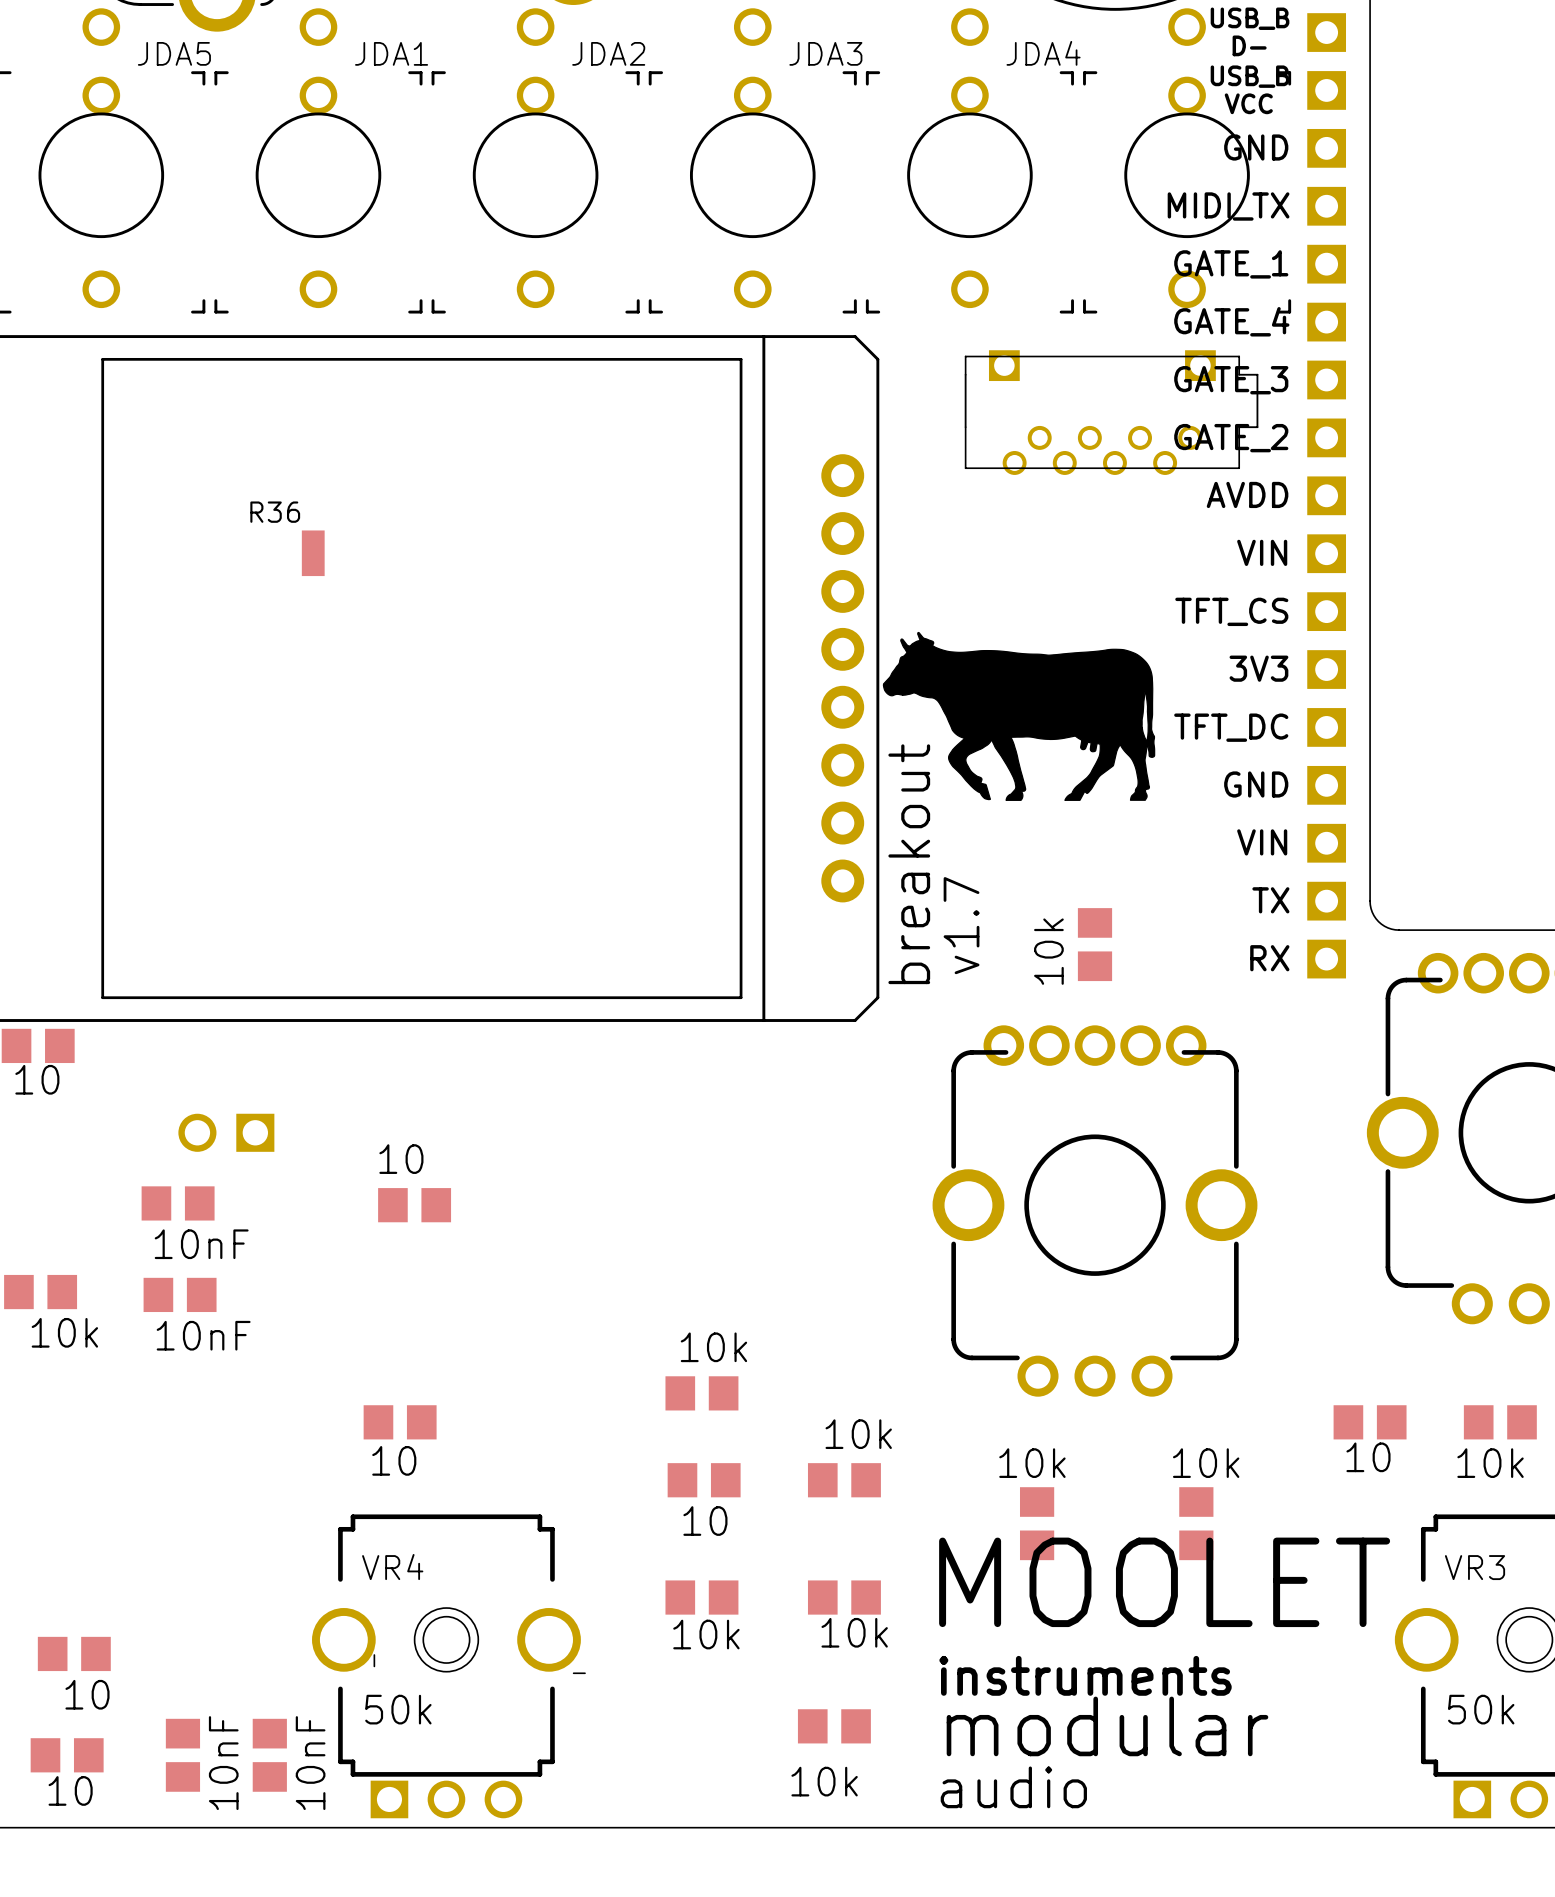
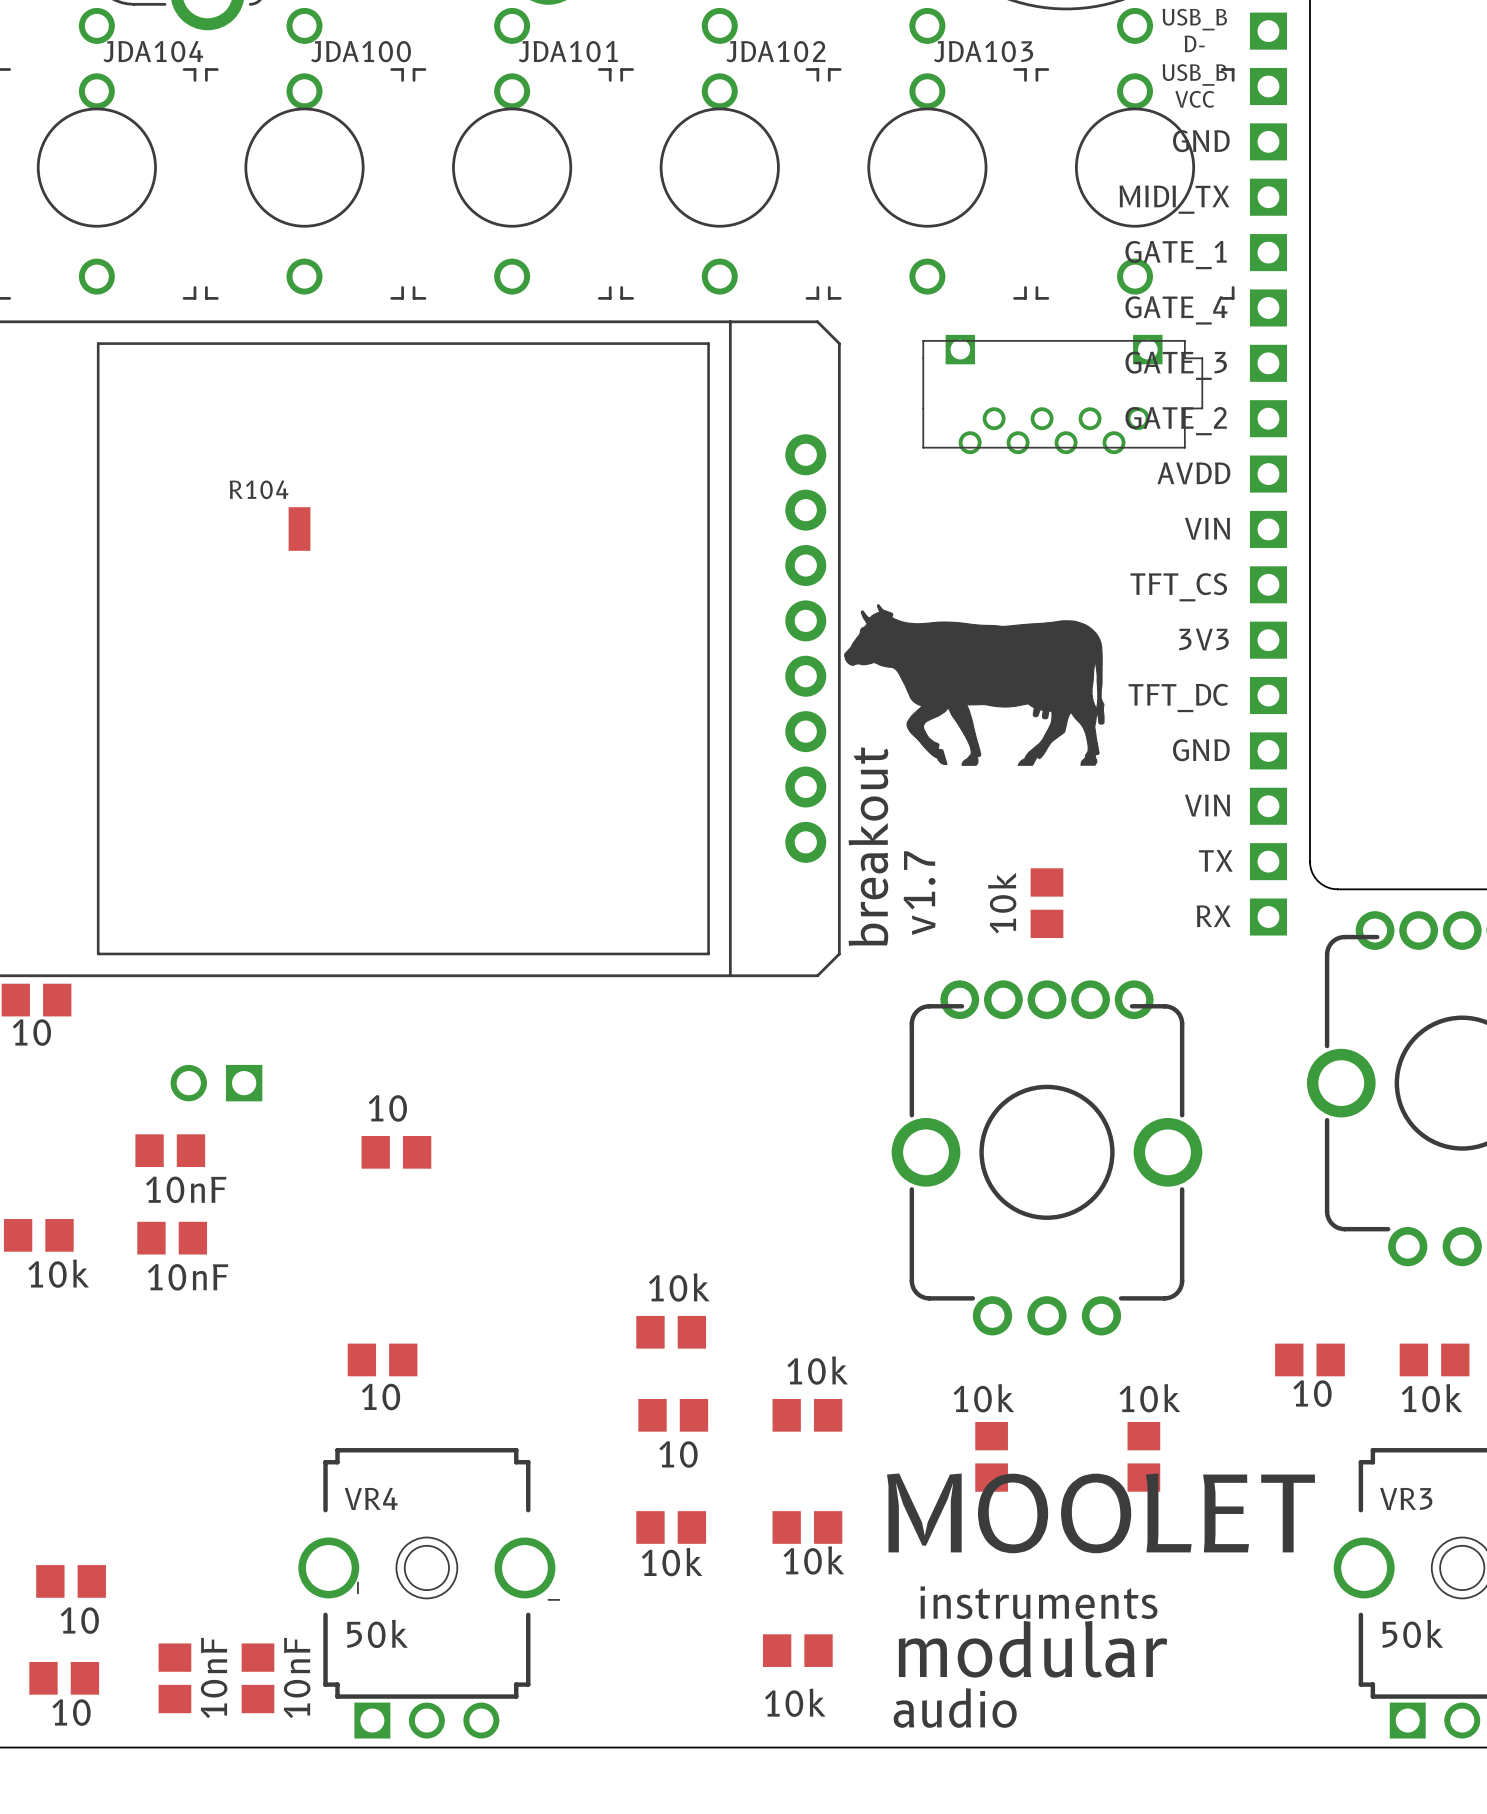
JDA5 name: JDA5 (174, 53) -> JDA104 (153, 51)
JDA1 name: JDA1 (391, 53) -> JDA100 (361, 51)
JDA2 name: JDA2 (608, 53) -> JDA101 (568, 51)
JDA3 name: JDA3 (825, 53) -> JDA102 (775, 51)
JDA4 name: JDA4 (1043, 53) -> JDA103 (983, 51)
R36 name: R36 (275, 512) -> R104 (259, 489)

